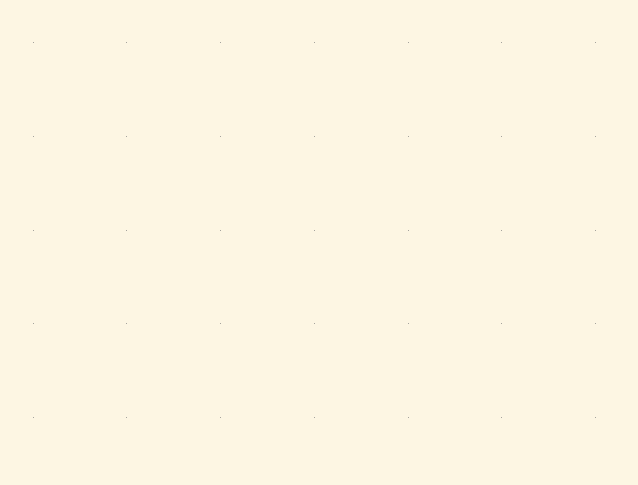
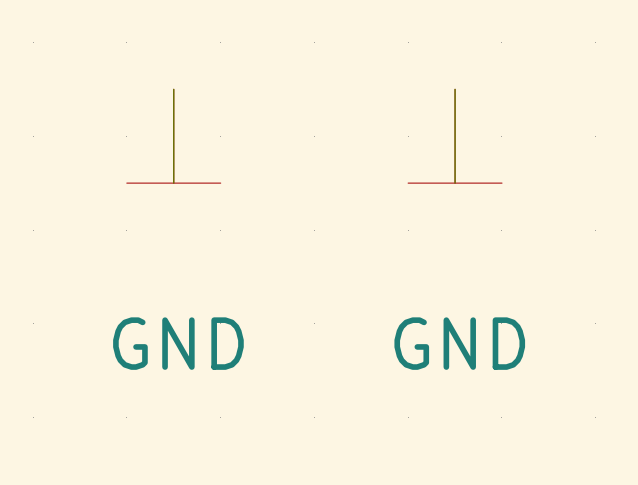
wire: none -> (173, 89) (173, 183)
wire: none -> (455, 89) (455, 183)
power symbol: none -> GND (173, 136)
power symbol: none -> GND (455, 136)

